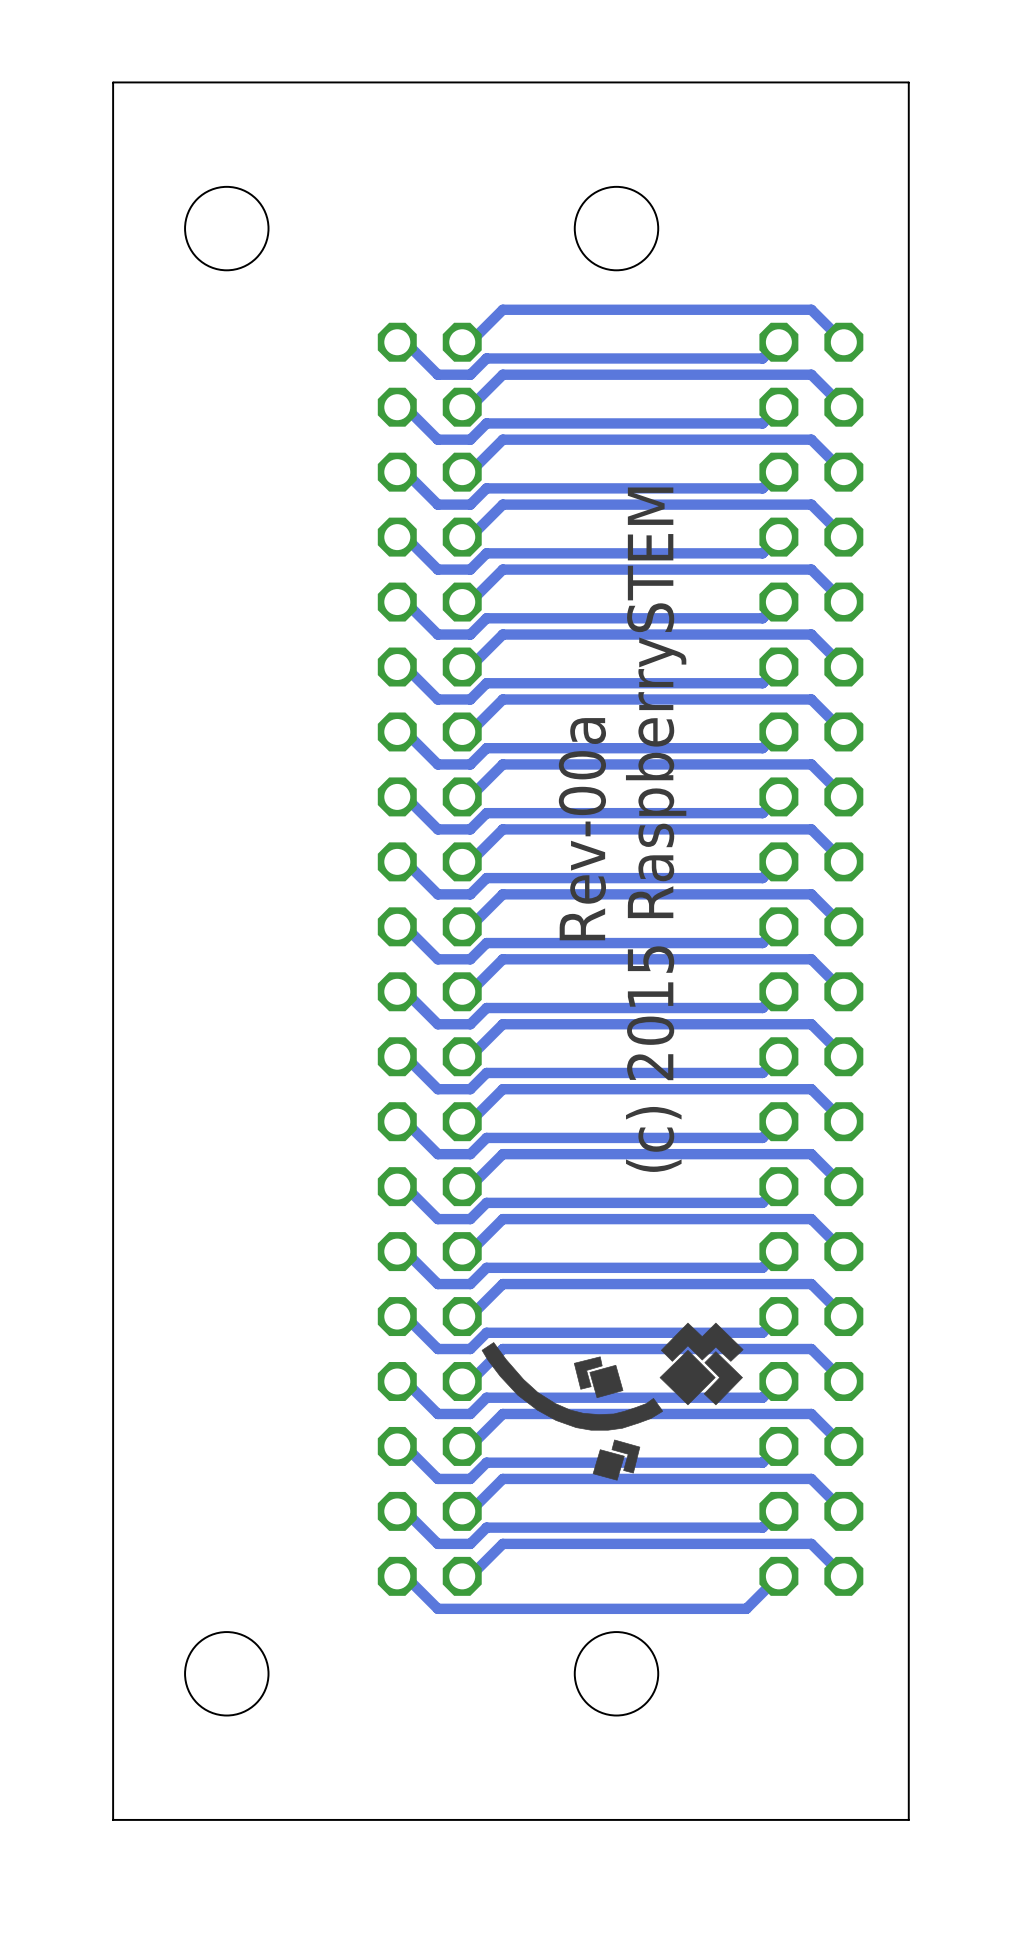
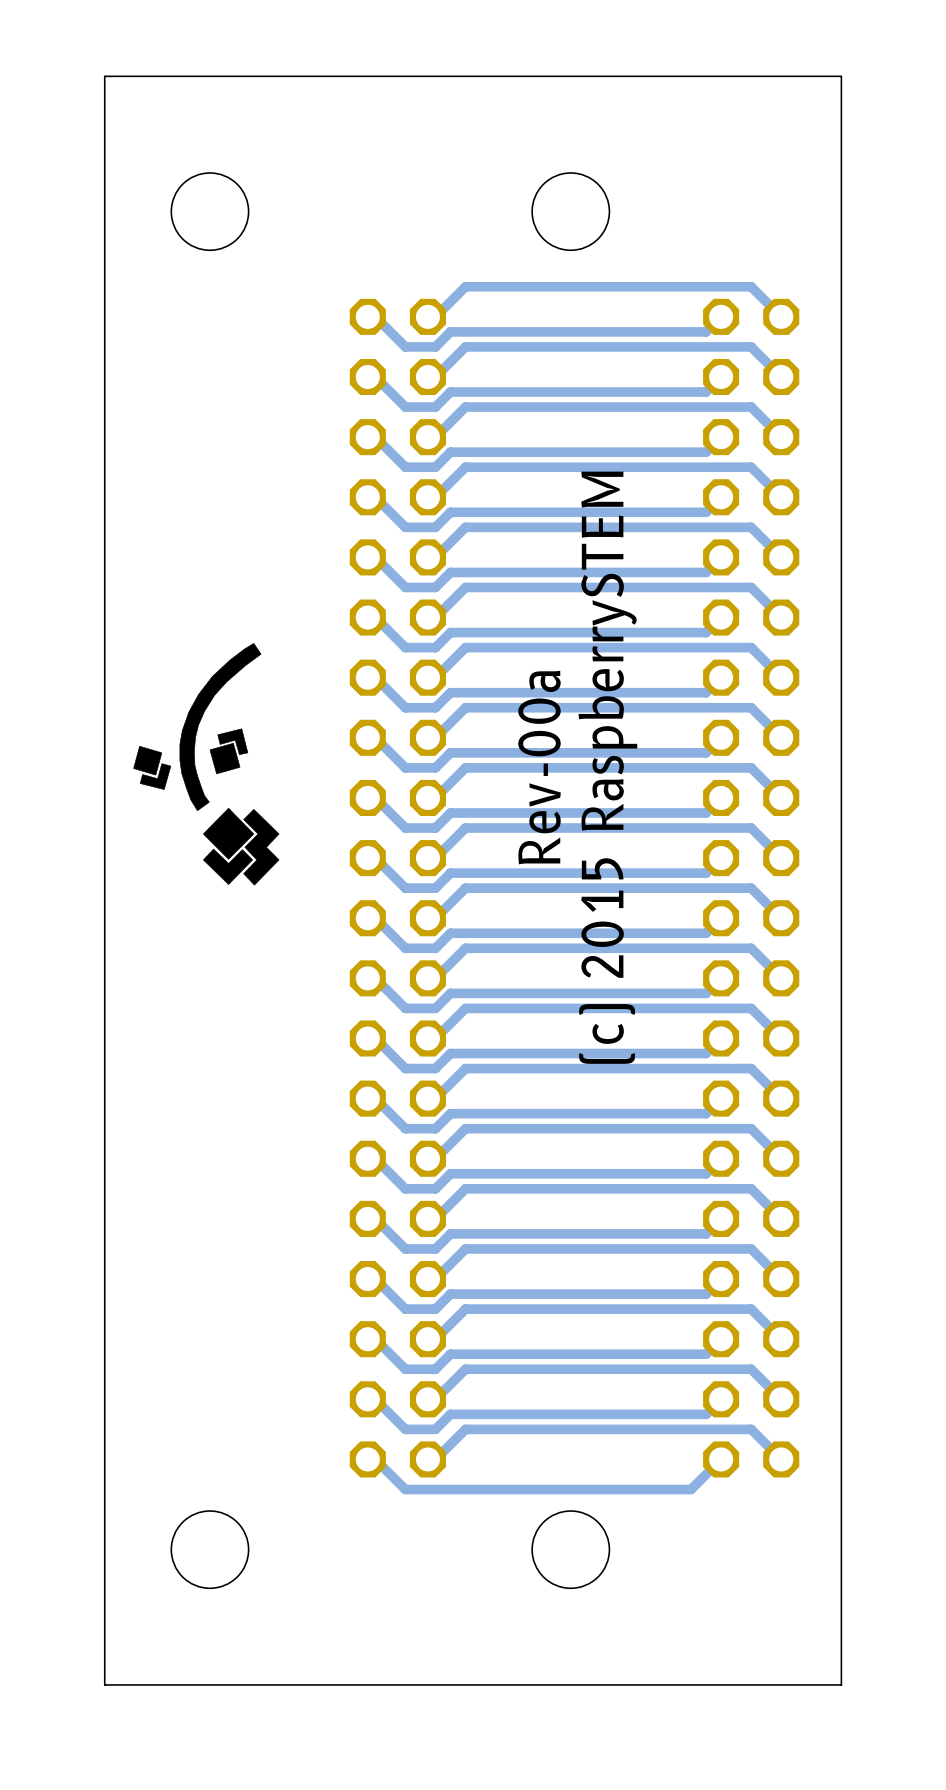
drawing: none -> [133, 643, 280, 886]
drawing: [481, 1322, 744, 1481] -> none

